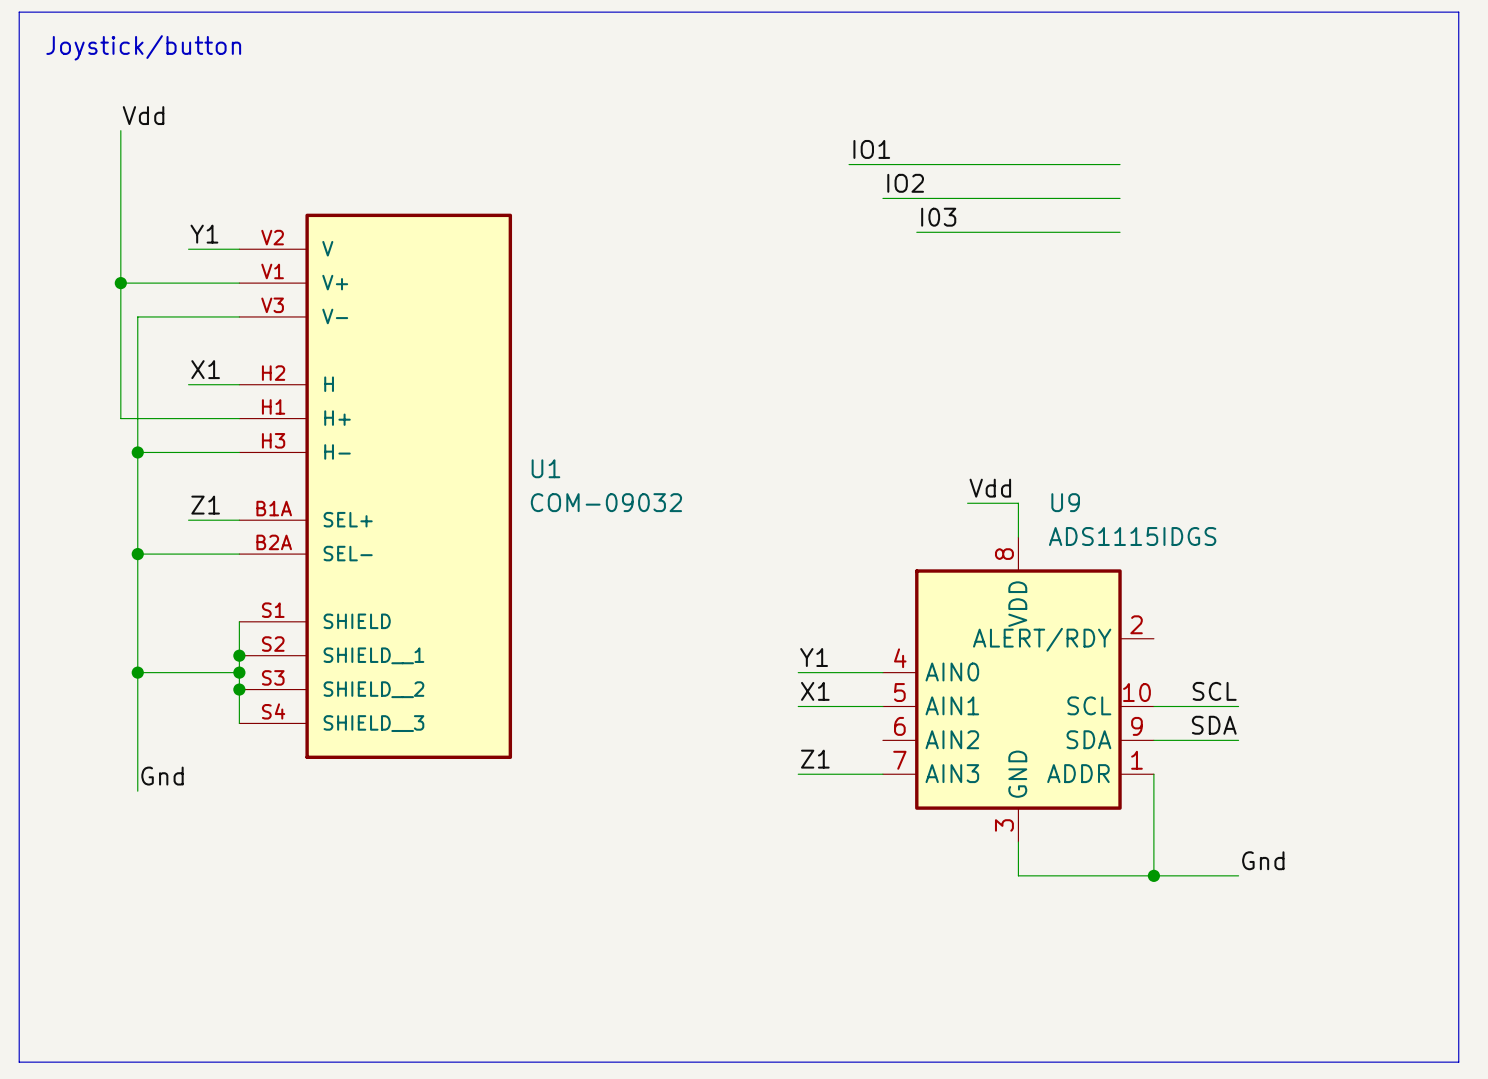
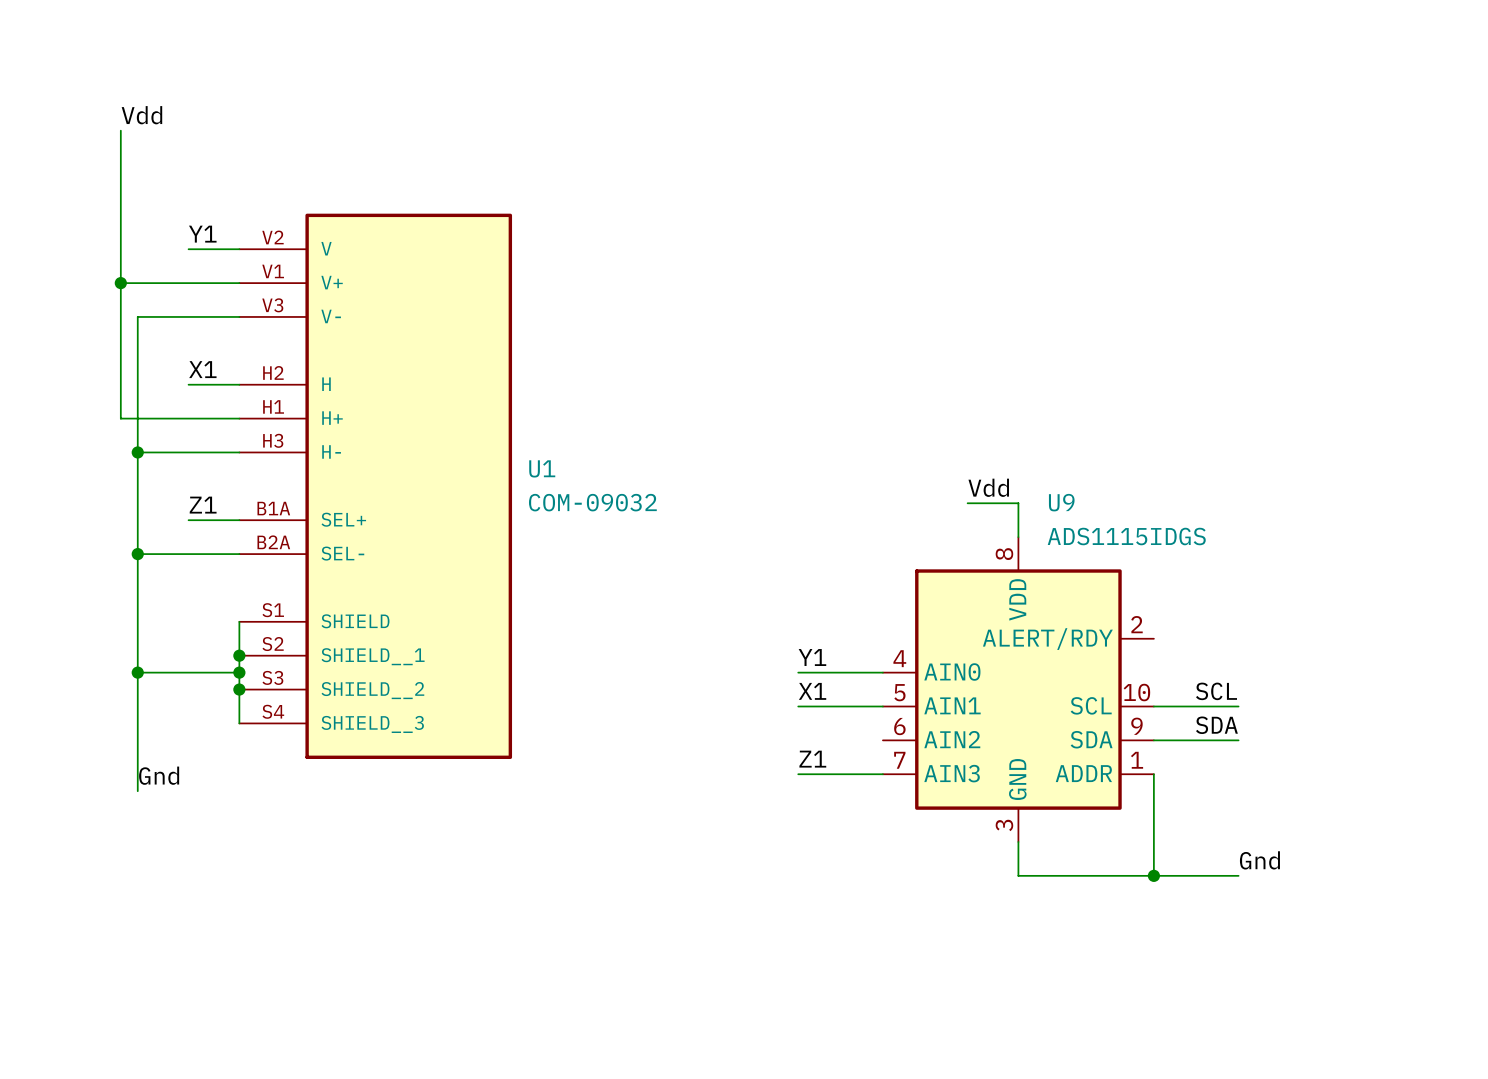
line: (19, 12) (1458, 12) (1458, 1062) (19, 1062) (19, 12) -> none
text: Joystick/button (143, 47) -> none
label: IO1 (871, 149) -> none
wire: (849, 164) (1120, 164) -> none
label: IO2 (905, 183) -> none
wire: (882, 198) (1120, 198) -> none
label: I03 (938, 217) -> none
wire: (916, 232) (1120, 232) -> none

